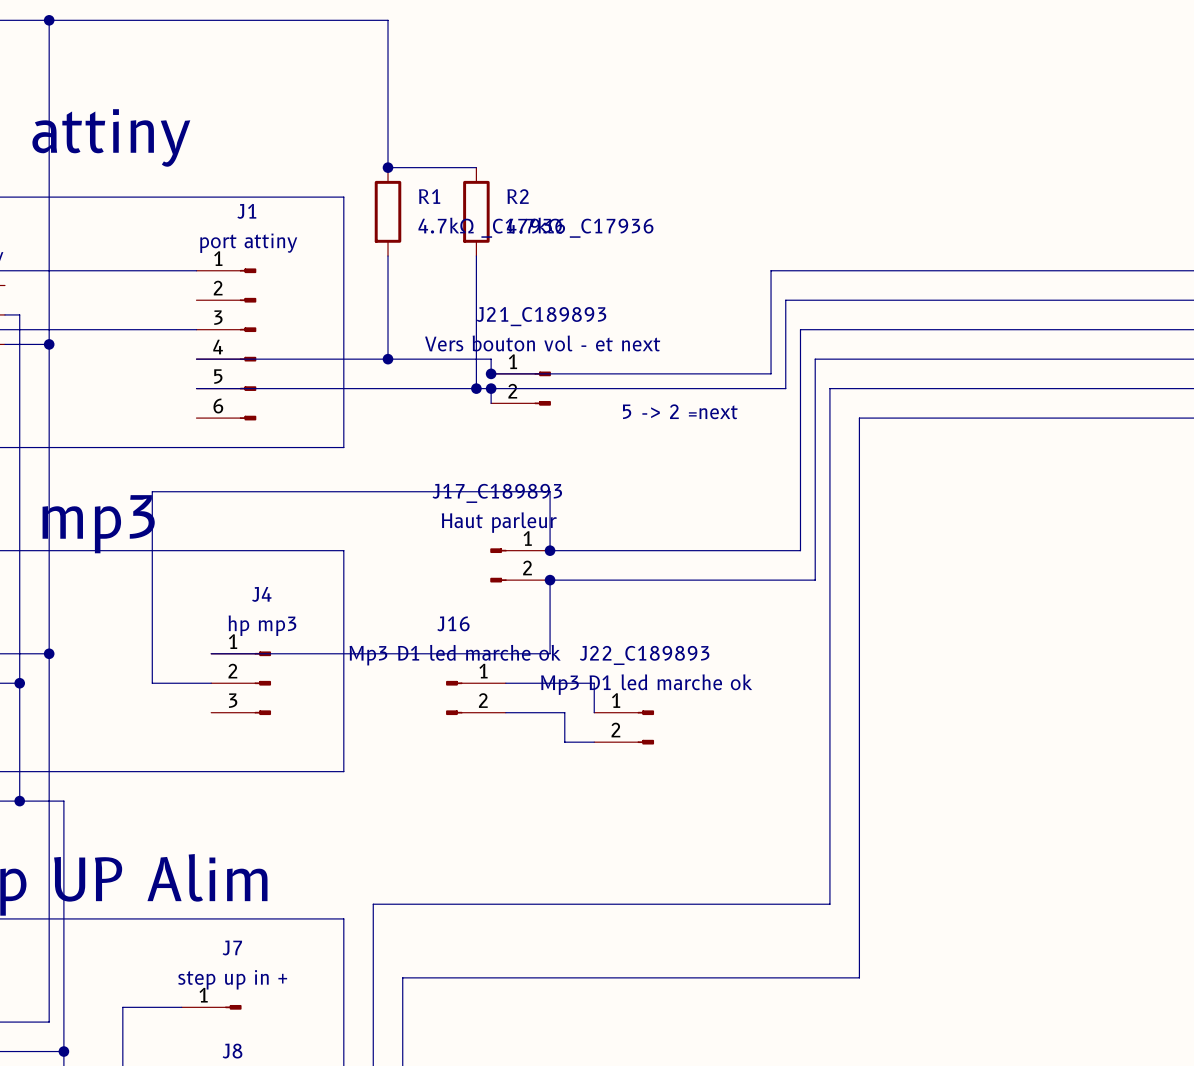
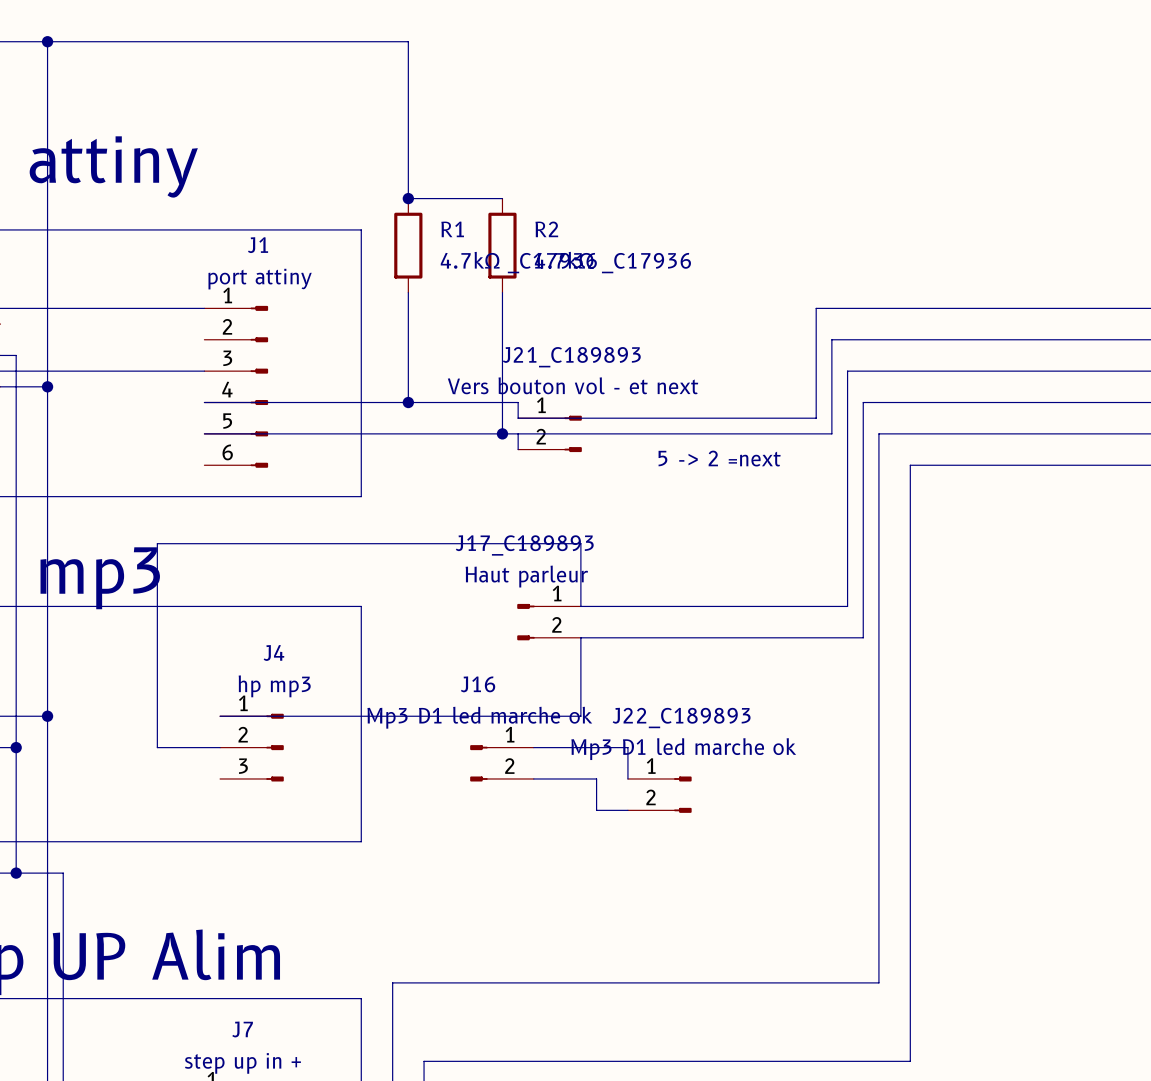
junction: (491, 373) -> none
junction: (491, 388) -> none
junction: (550, 550) -> none
junction: (550, 580) -> none

